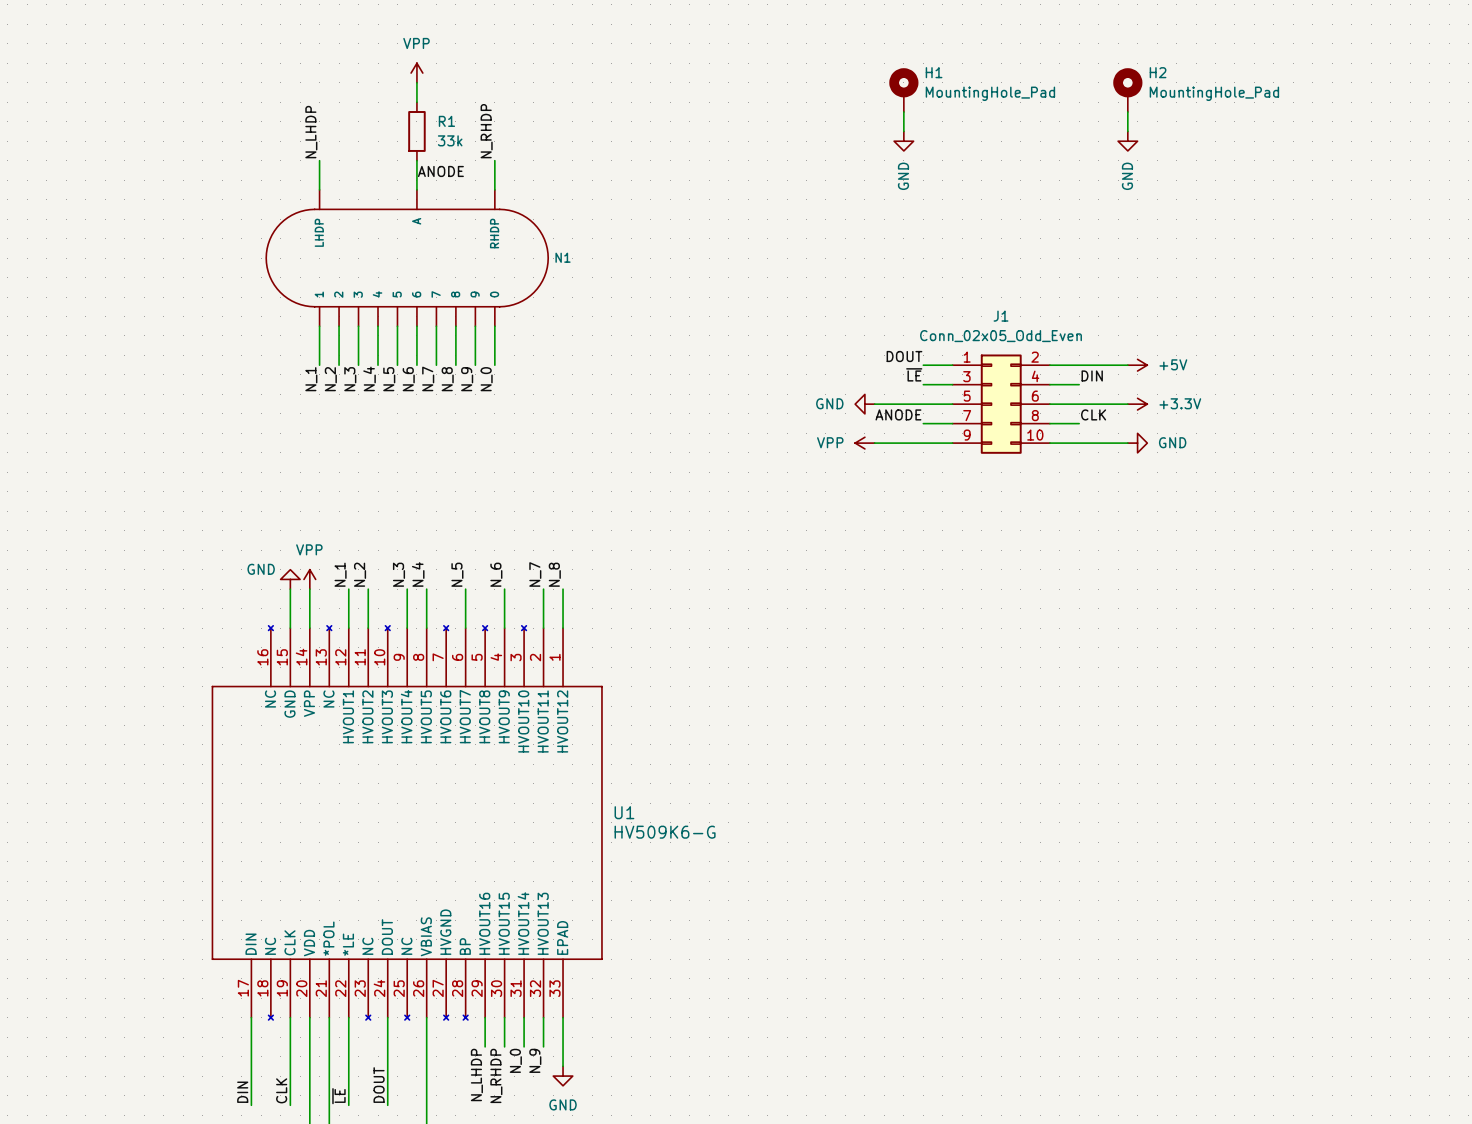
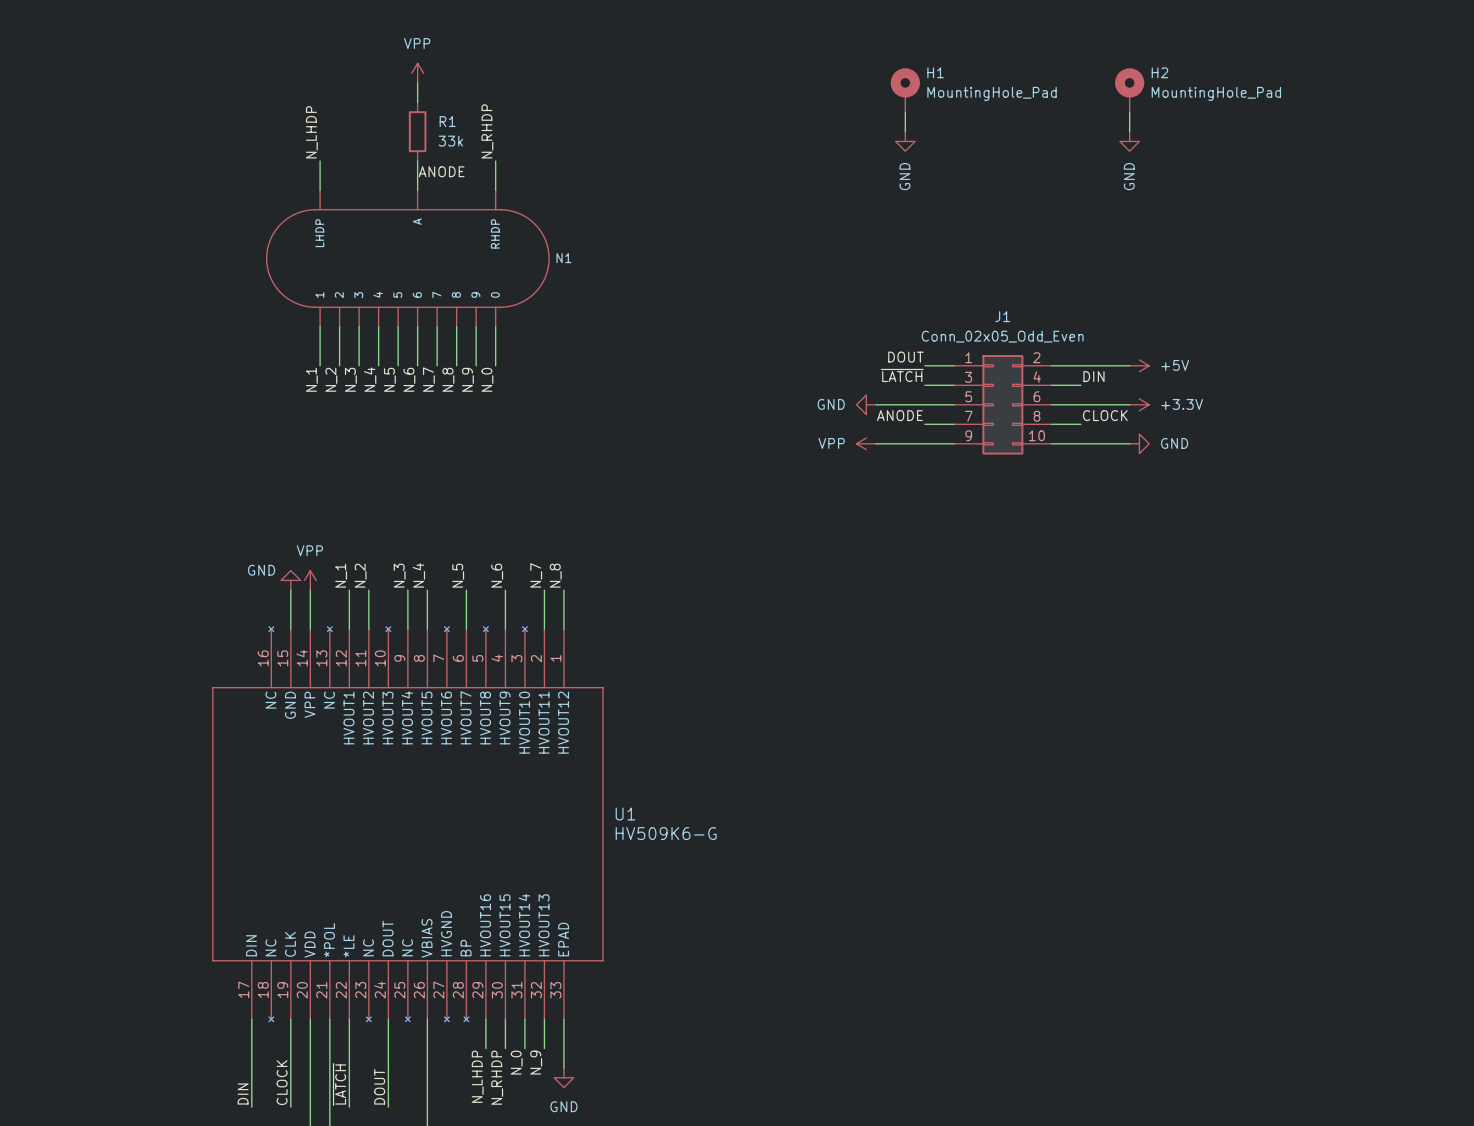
label: ~{LE} (914, 374) -> ~{LATCH} (902, 375)
label: CLK (1093, 414) -> CLOCK (1105, 415)
label: CLK (281, 1090) -> CLOCK (282, 1082)
label: ~{LE} (338, 1096) -> ~{LATCH} (339, 1084)

